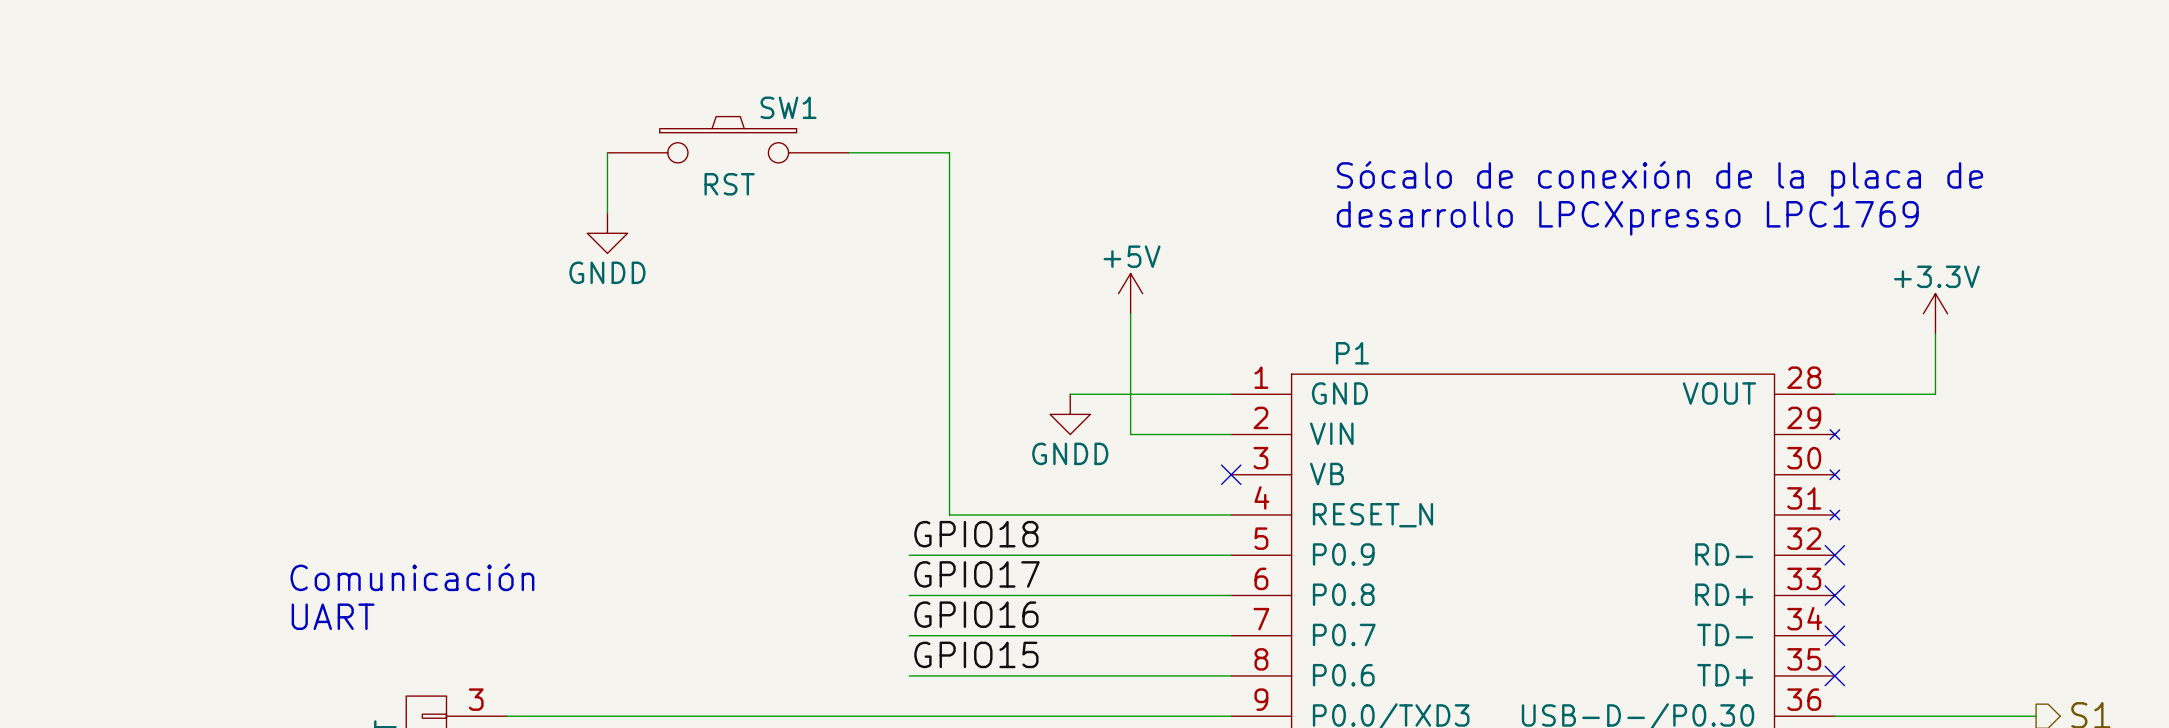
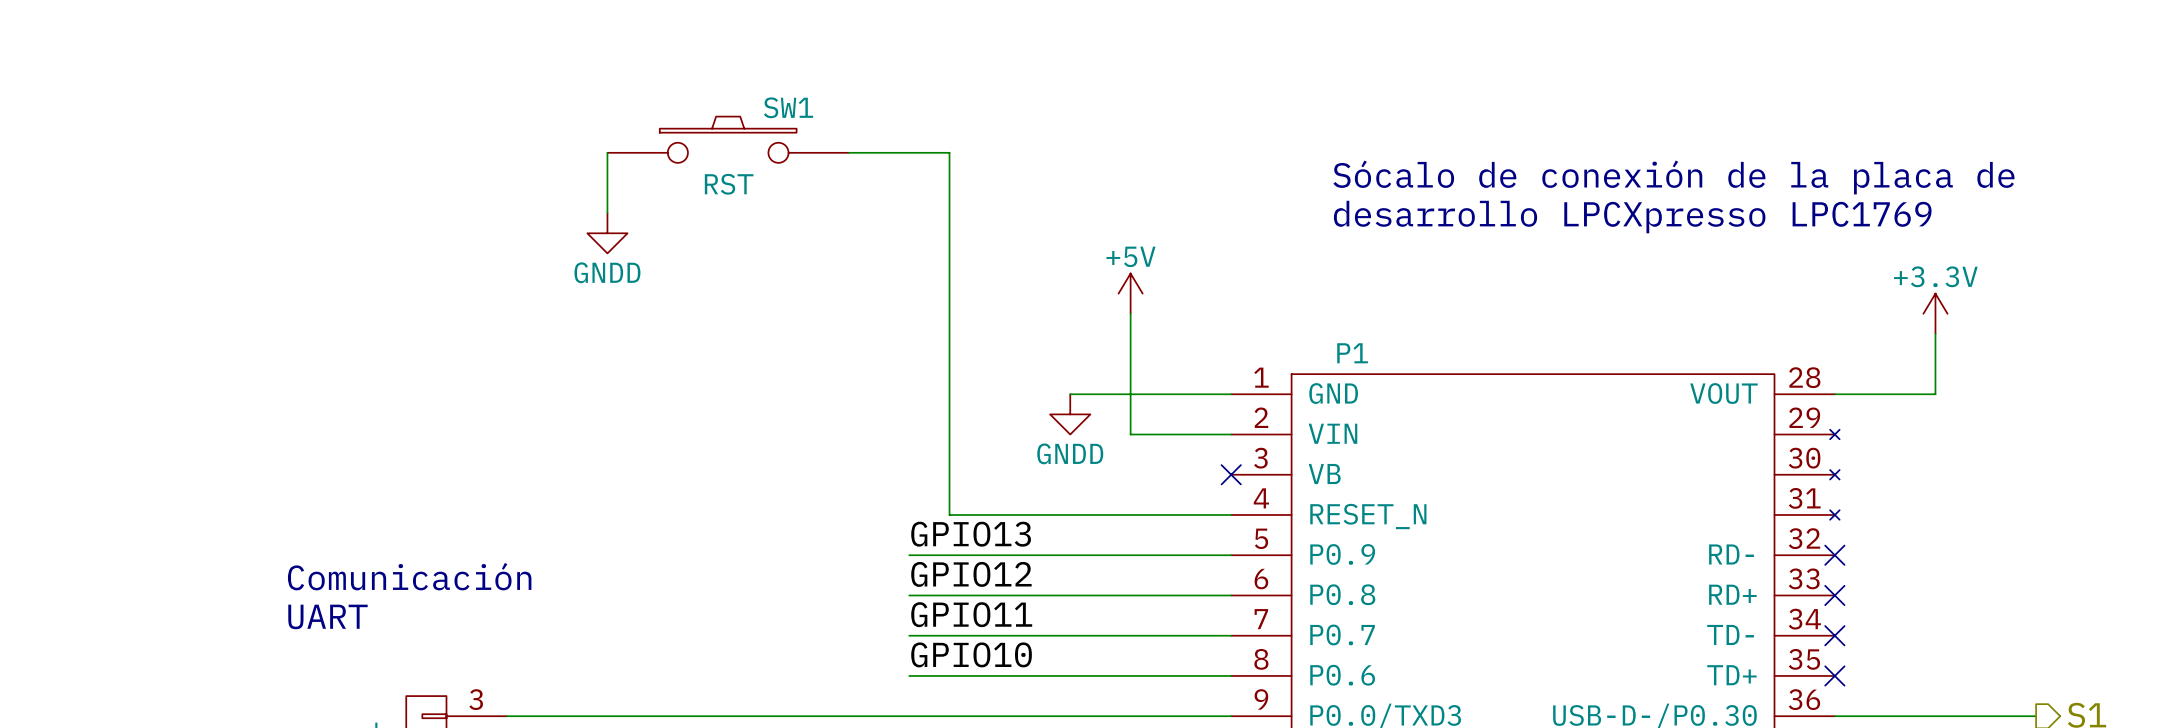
label: GPIO18 (976, 534) -> GPIO13 (971, 534)
label: GPIO17 (976, 574) -> GPIO12 (971, 574)
label: GPIO16 (976, 614) -> GPIO11 (971, 614)
label: GPIO15 (976, 654) -> GPIO10 (971, 654)

